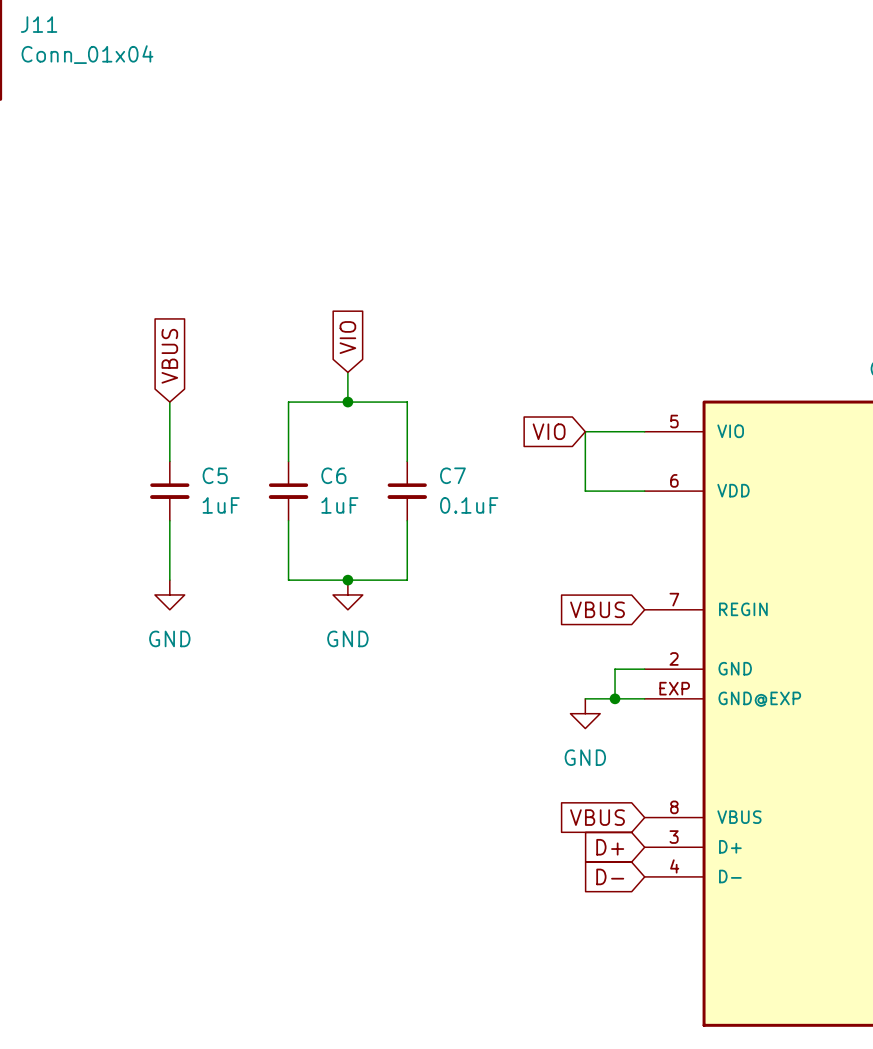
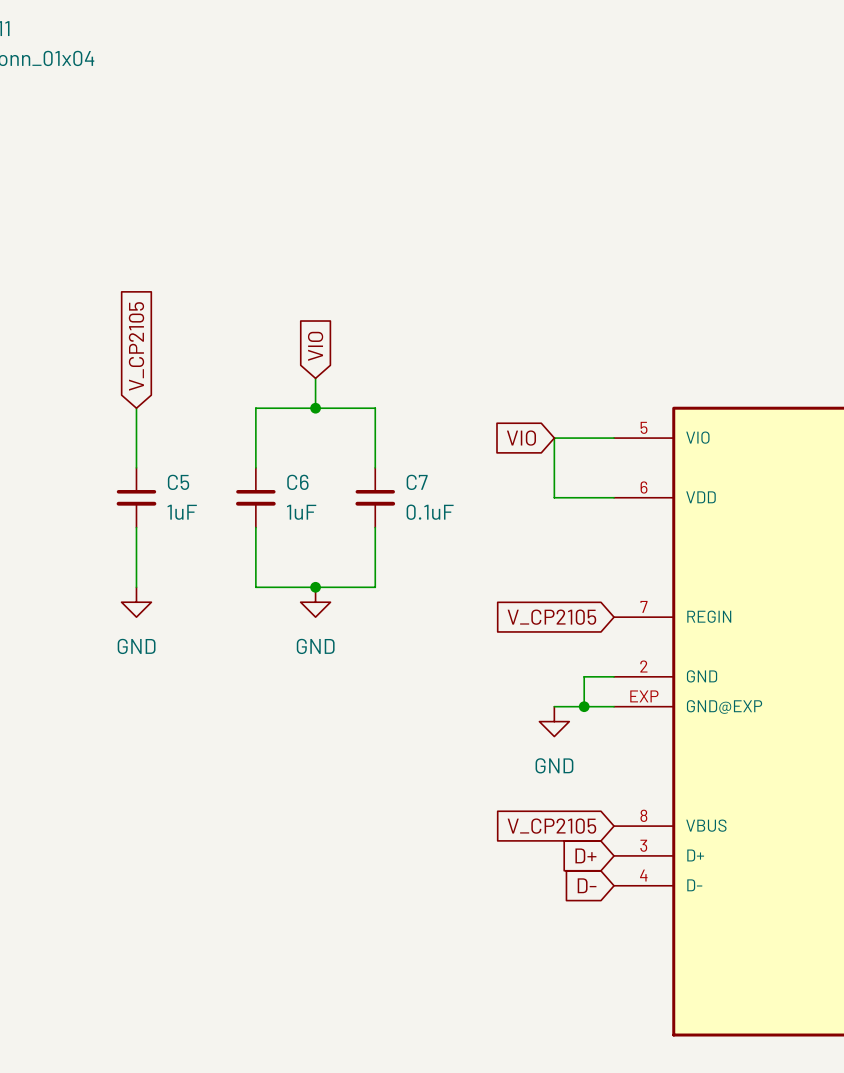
global label: VBUS (169, 356) -> V_CP2105 (136, 346)
global label: VBUS (597, 609) -> V_CP2105 (551, 617)
global label: VBUS (597, 817) -> V_CP2105 (551, 826)

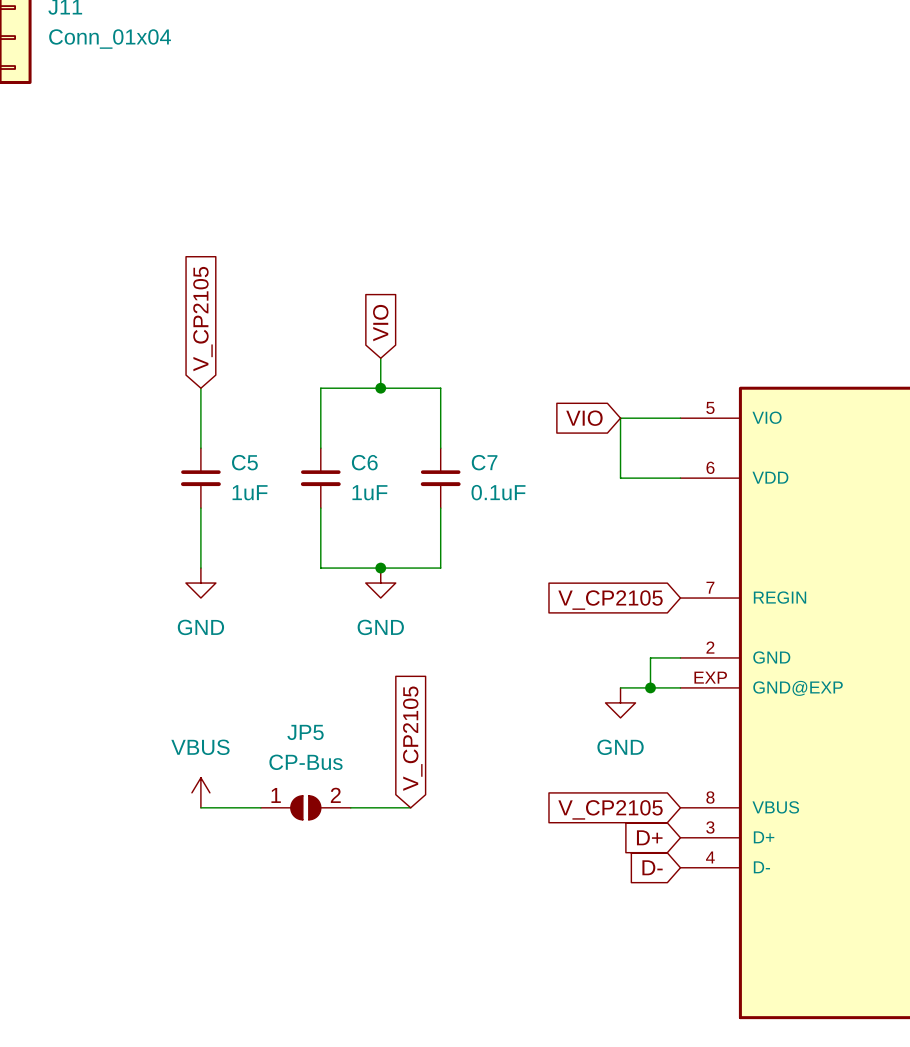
global label: none -> V_CP2105 (412, 738)
power symbol: none -> VBUS (200, 792)
wire: none -> (200, 807) (260, 807)
JP5: none -> CP-Bus (305, 807)
wire: none -> (350, 807) (410, 807)

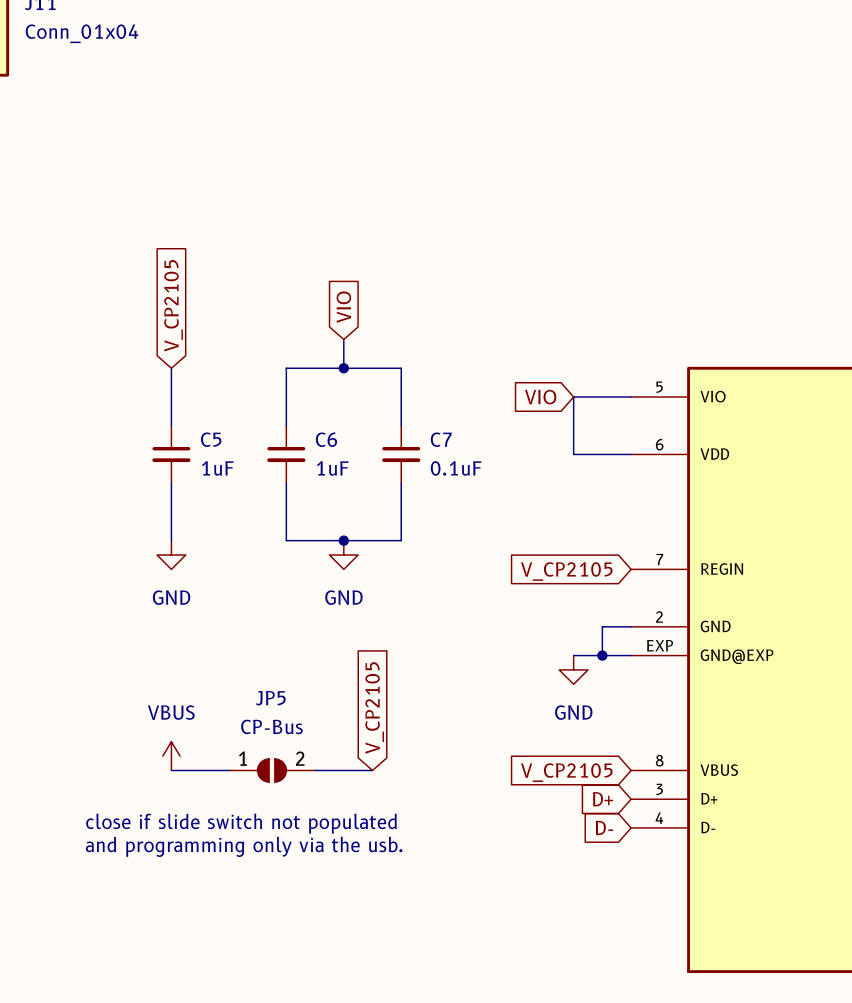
text: none -> close if slide switch not populated (241, 823)
text: none -> and programming only via the usb. (244, 846)

